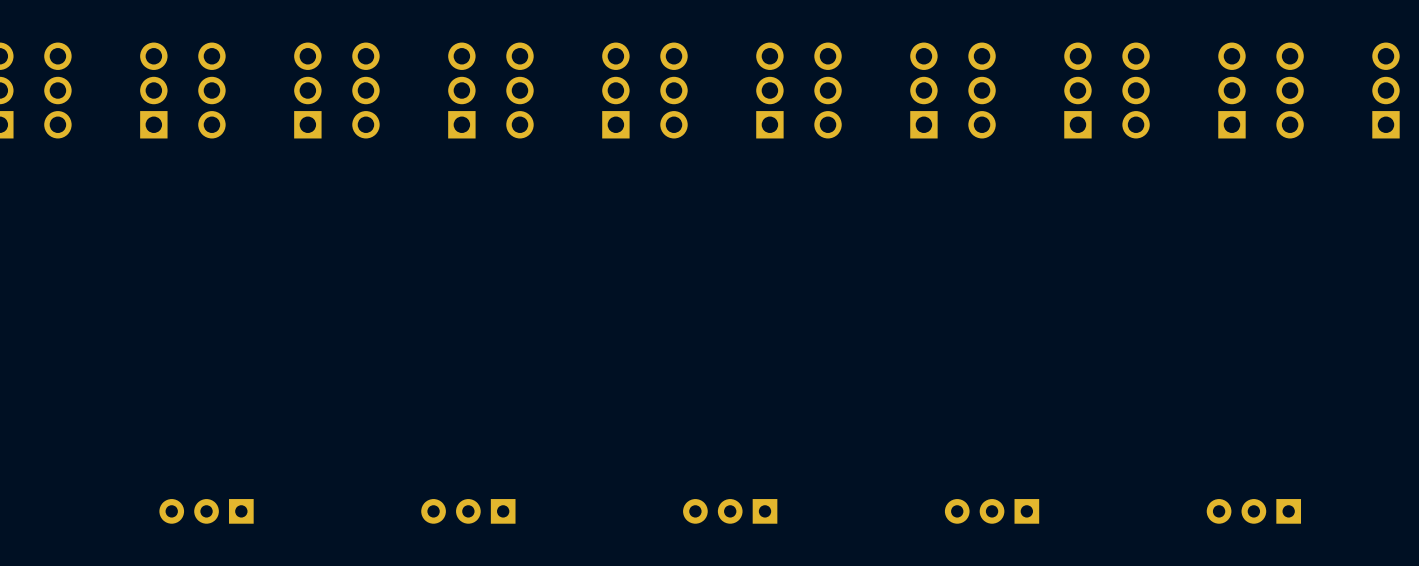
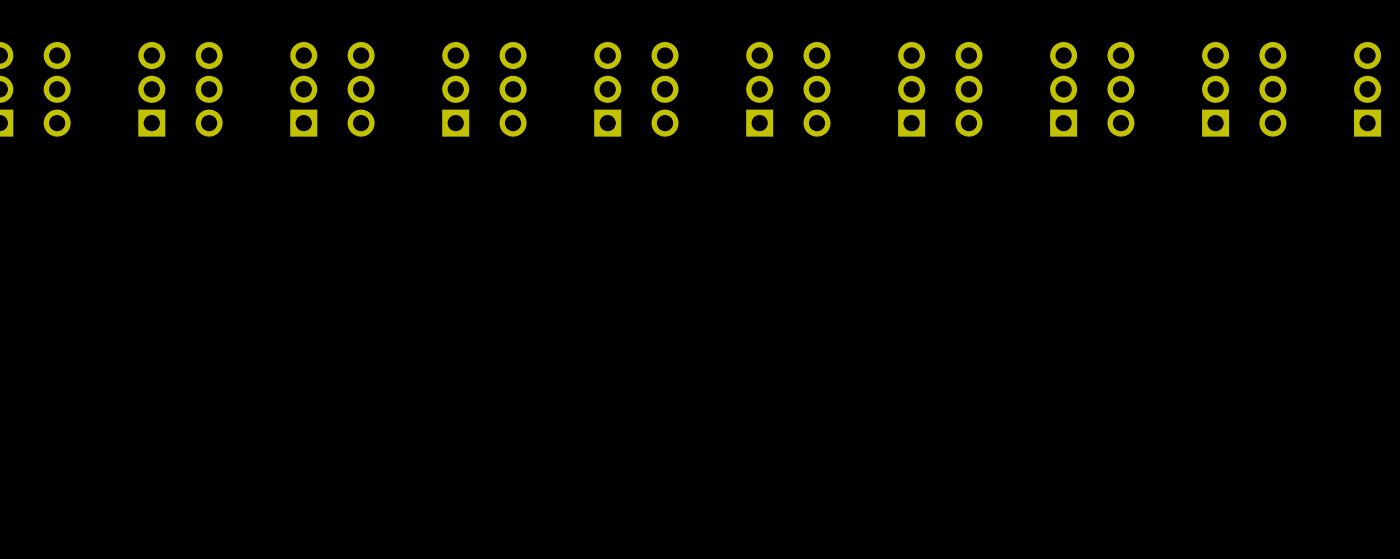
part: (206, 511) -> none
part: (468, 511) -> none
part: (730, 511) -> none
part: (992, 511) -> none
part: (1253, 511) -> none

